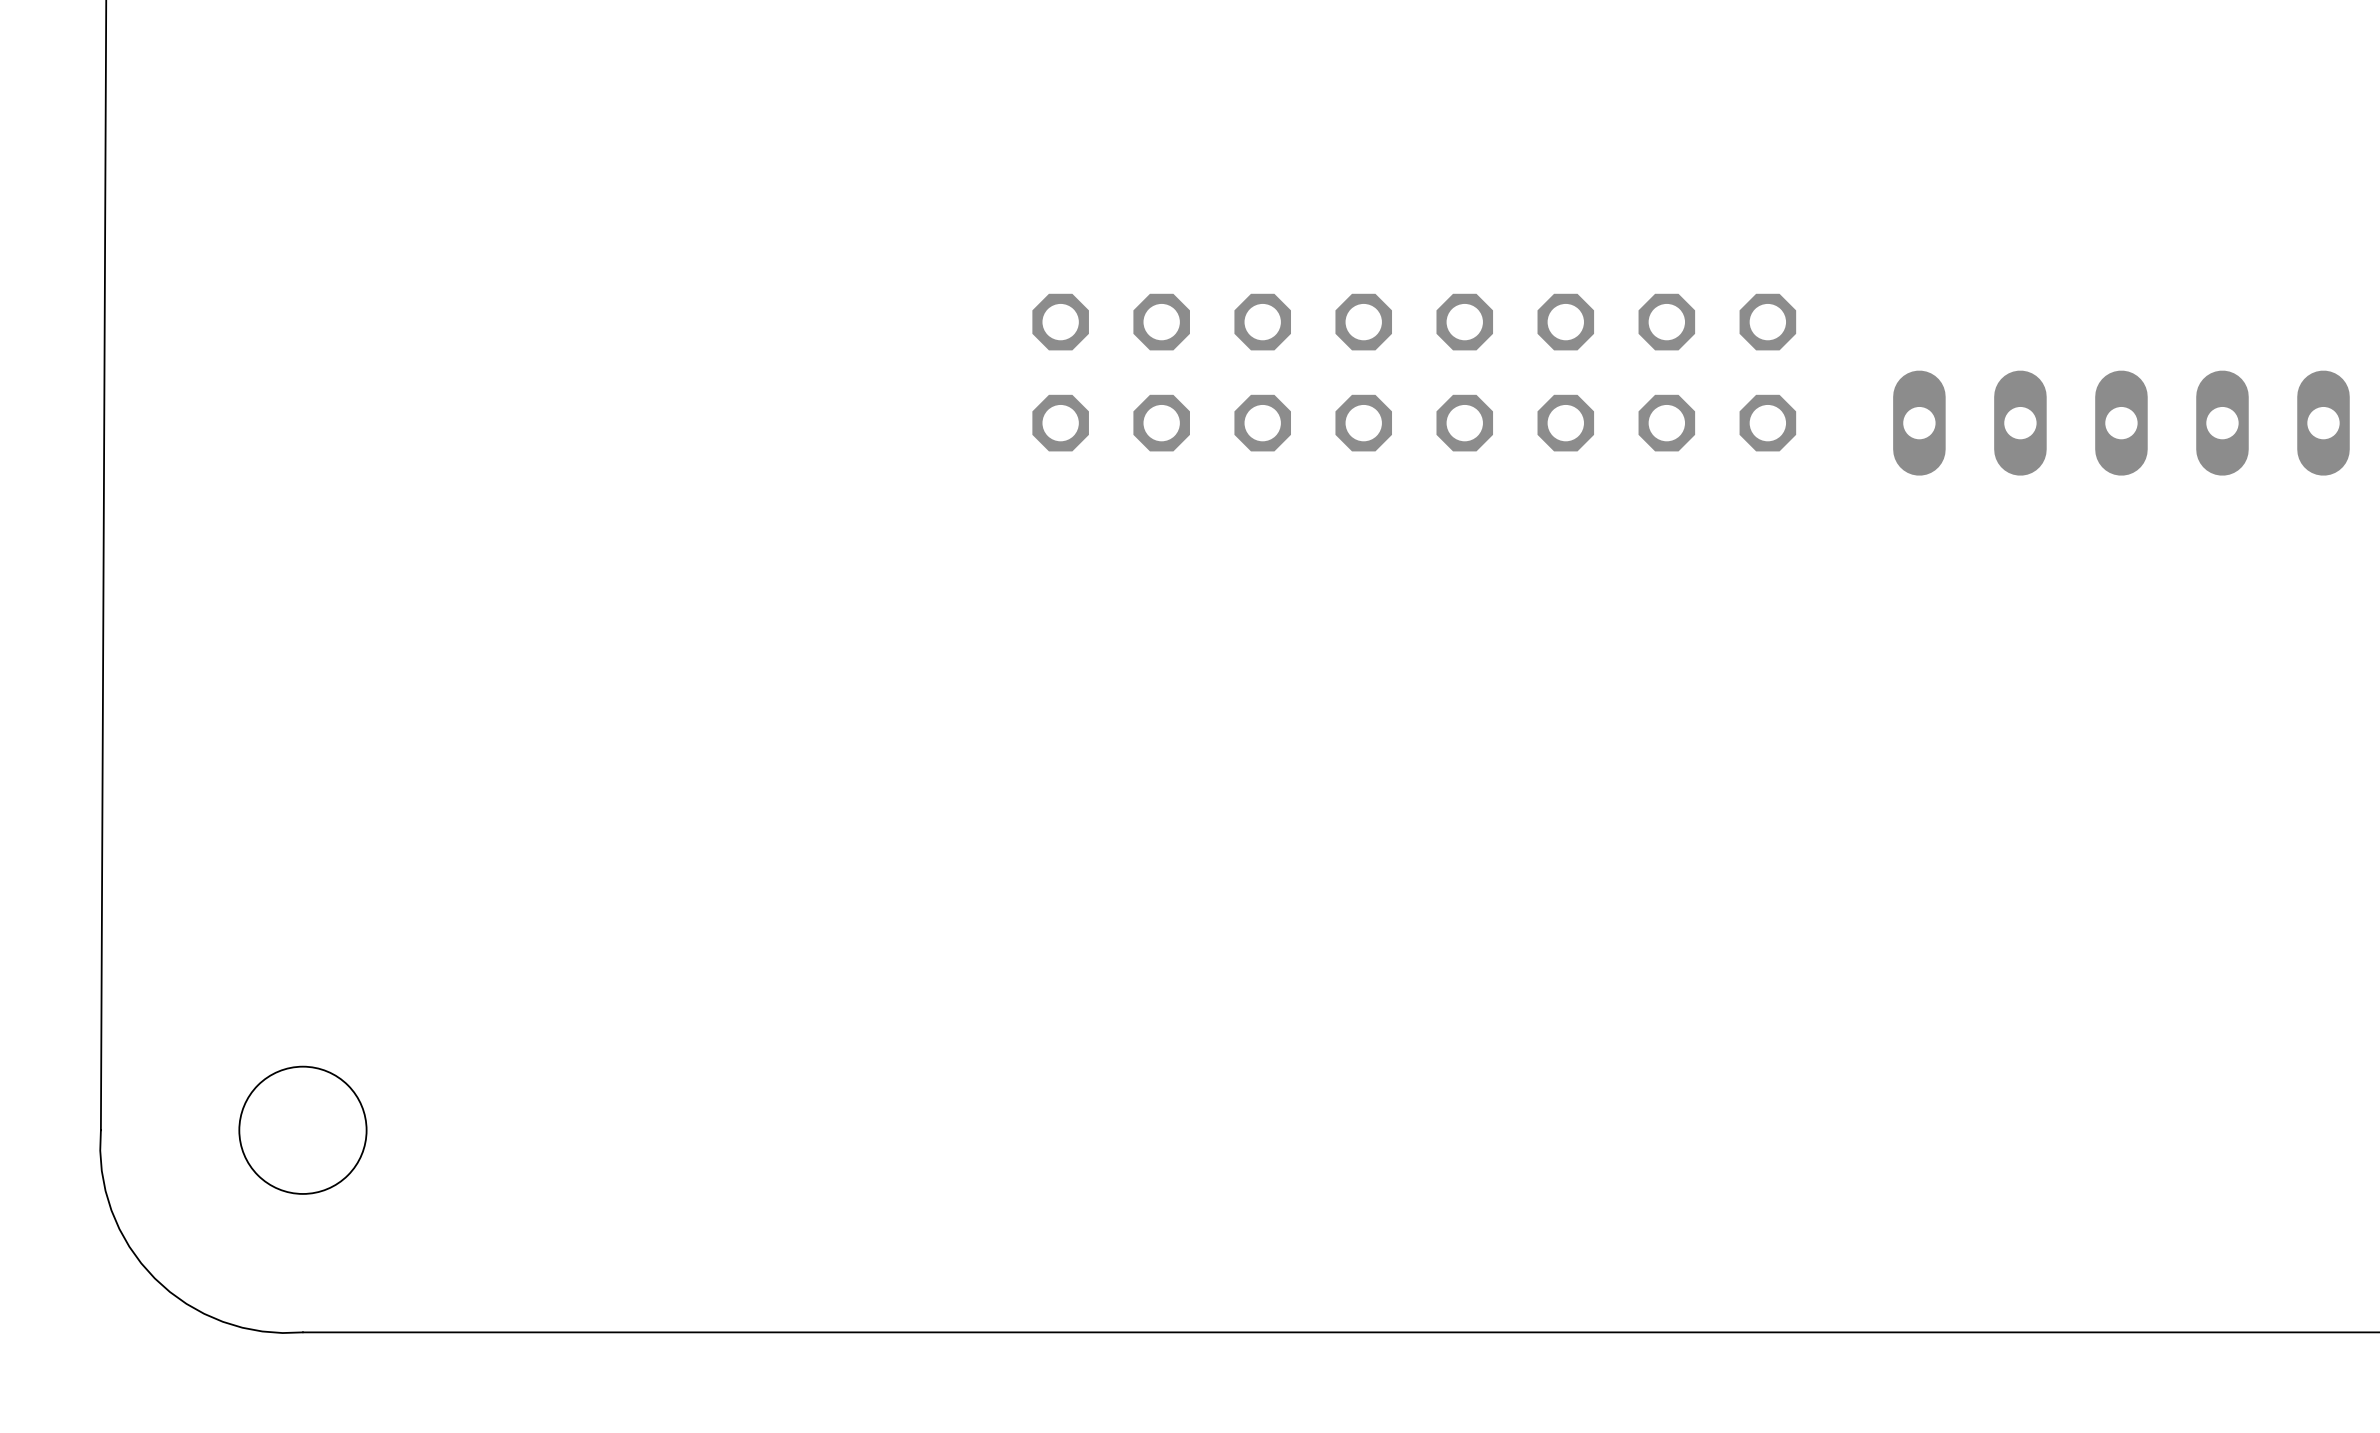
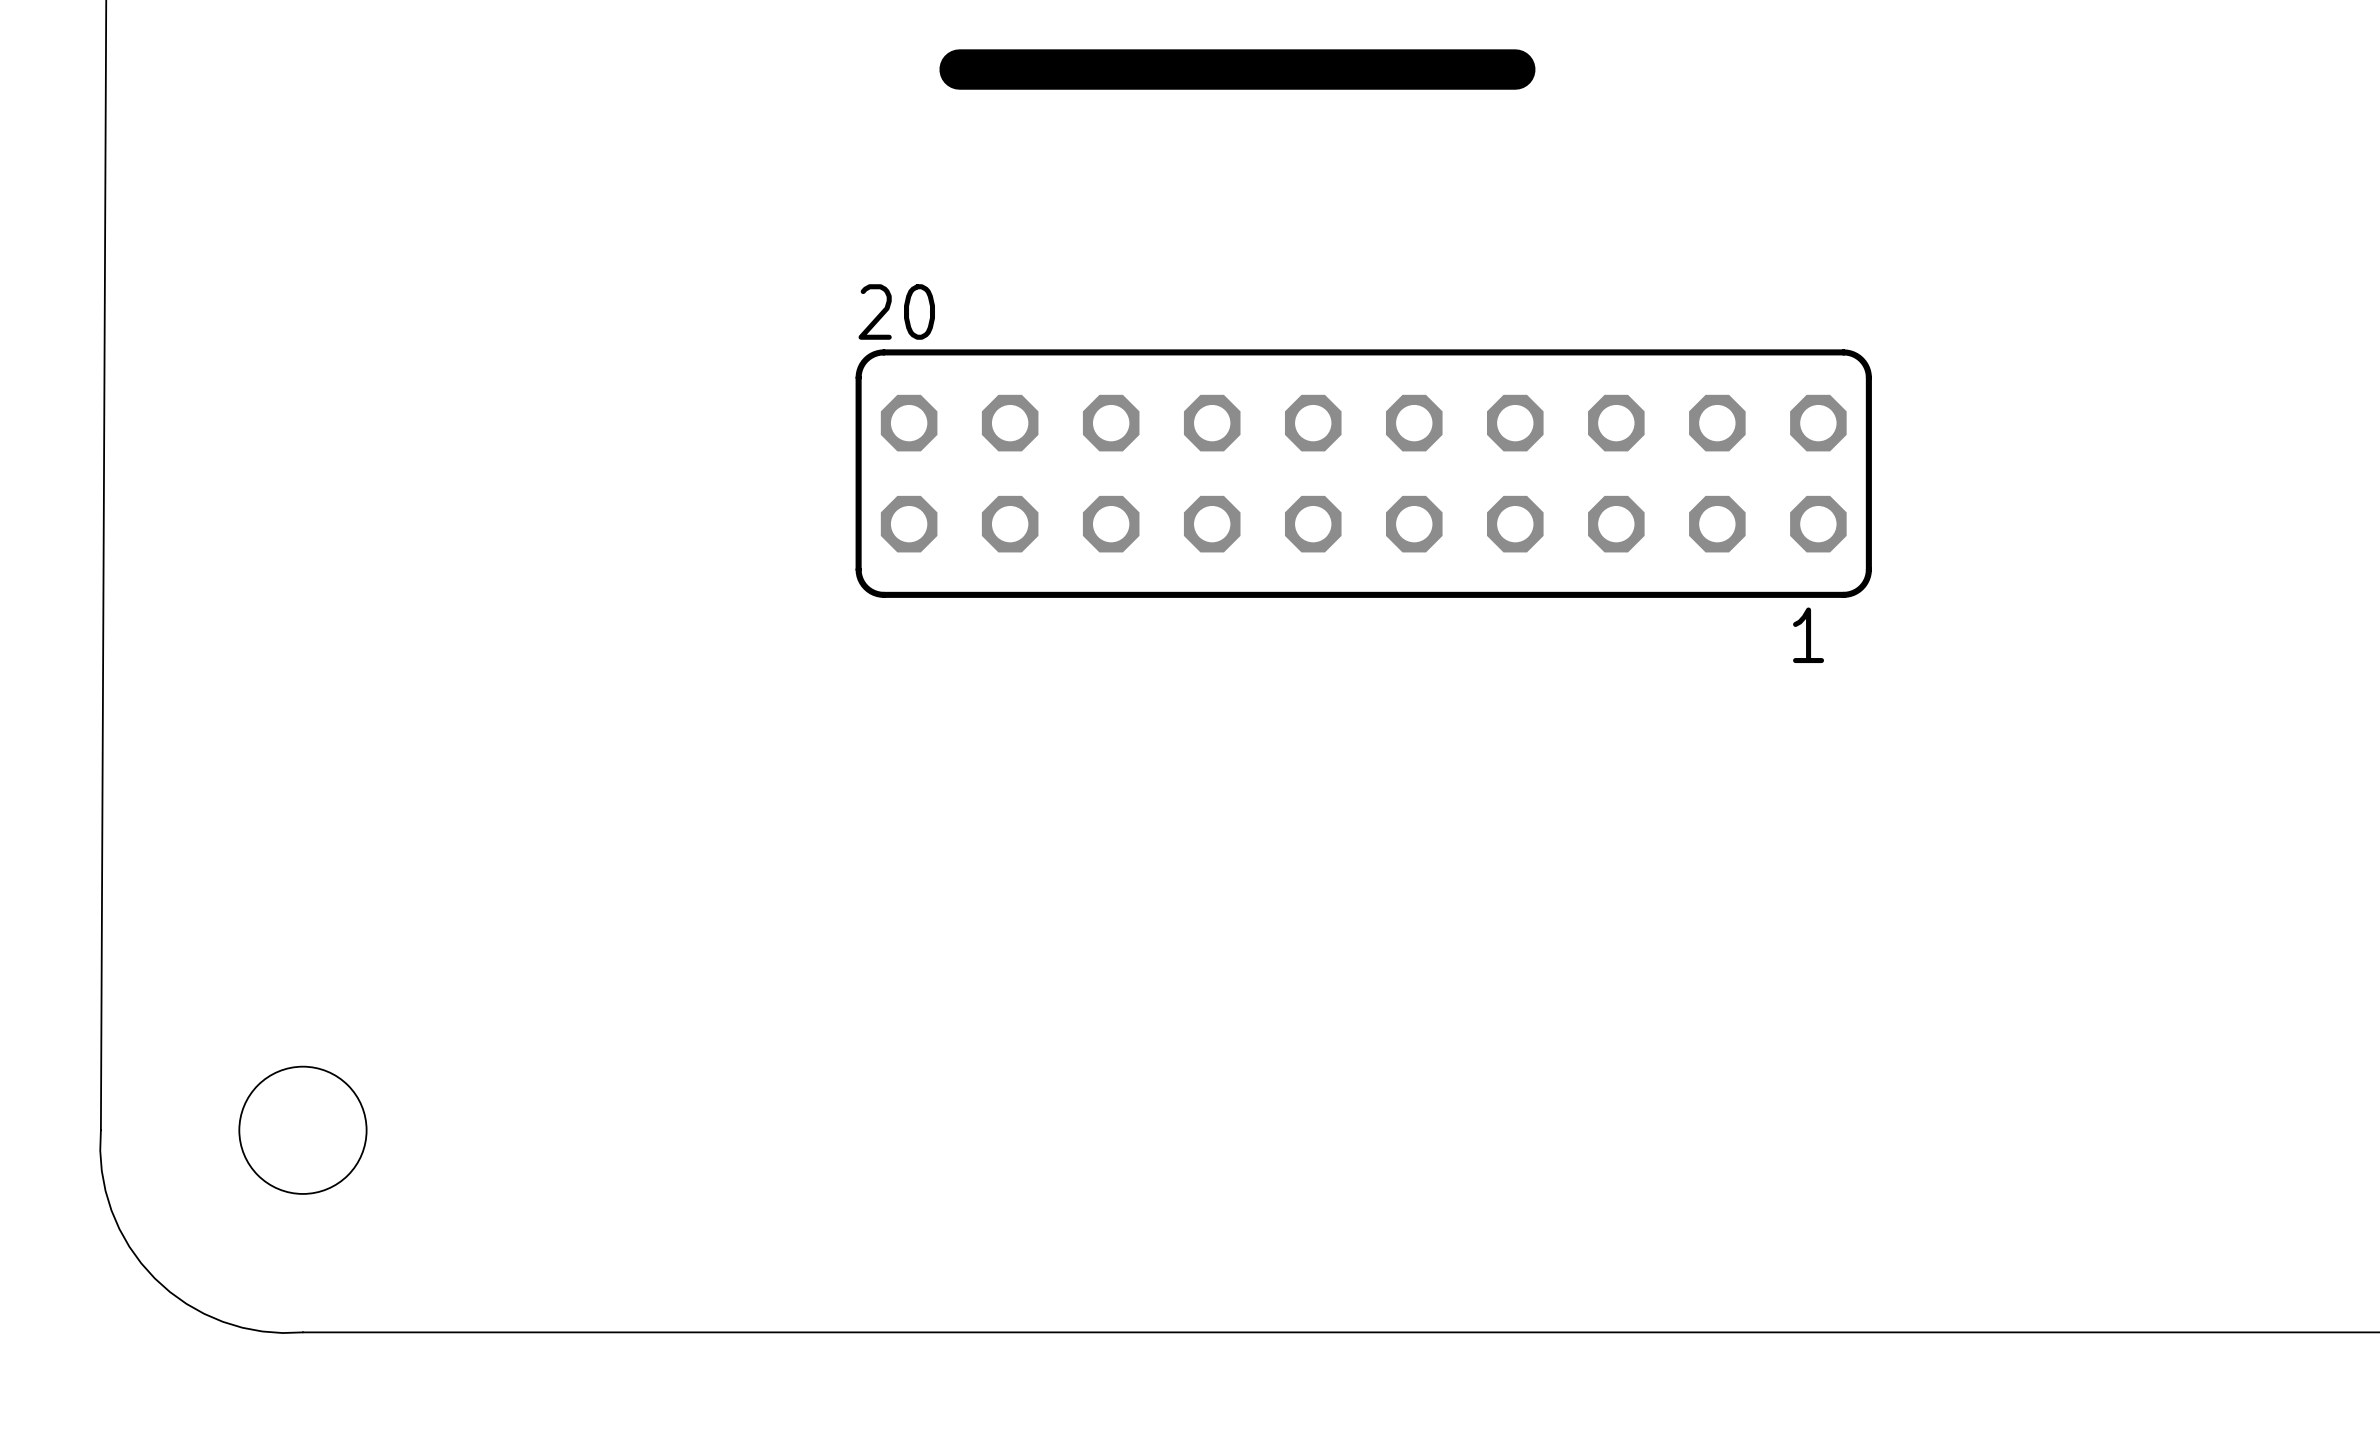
board edge: none -> (1515, 69) (959, 69)
part: (1414, 372) -> none
part: (2121, 423) -> none
part: none -> (1363, 473)

